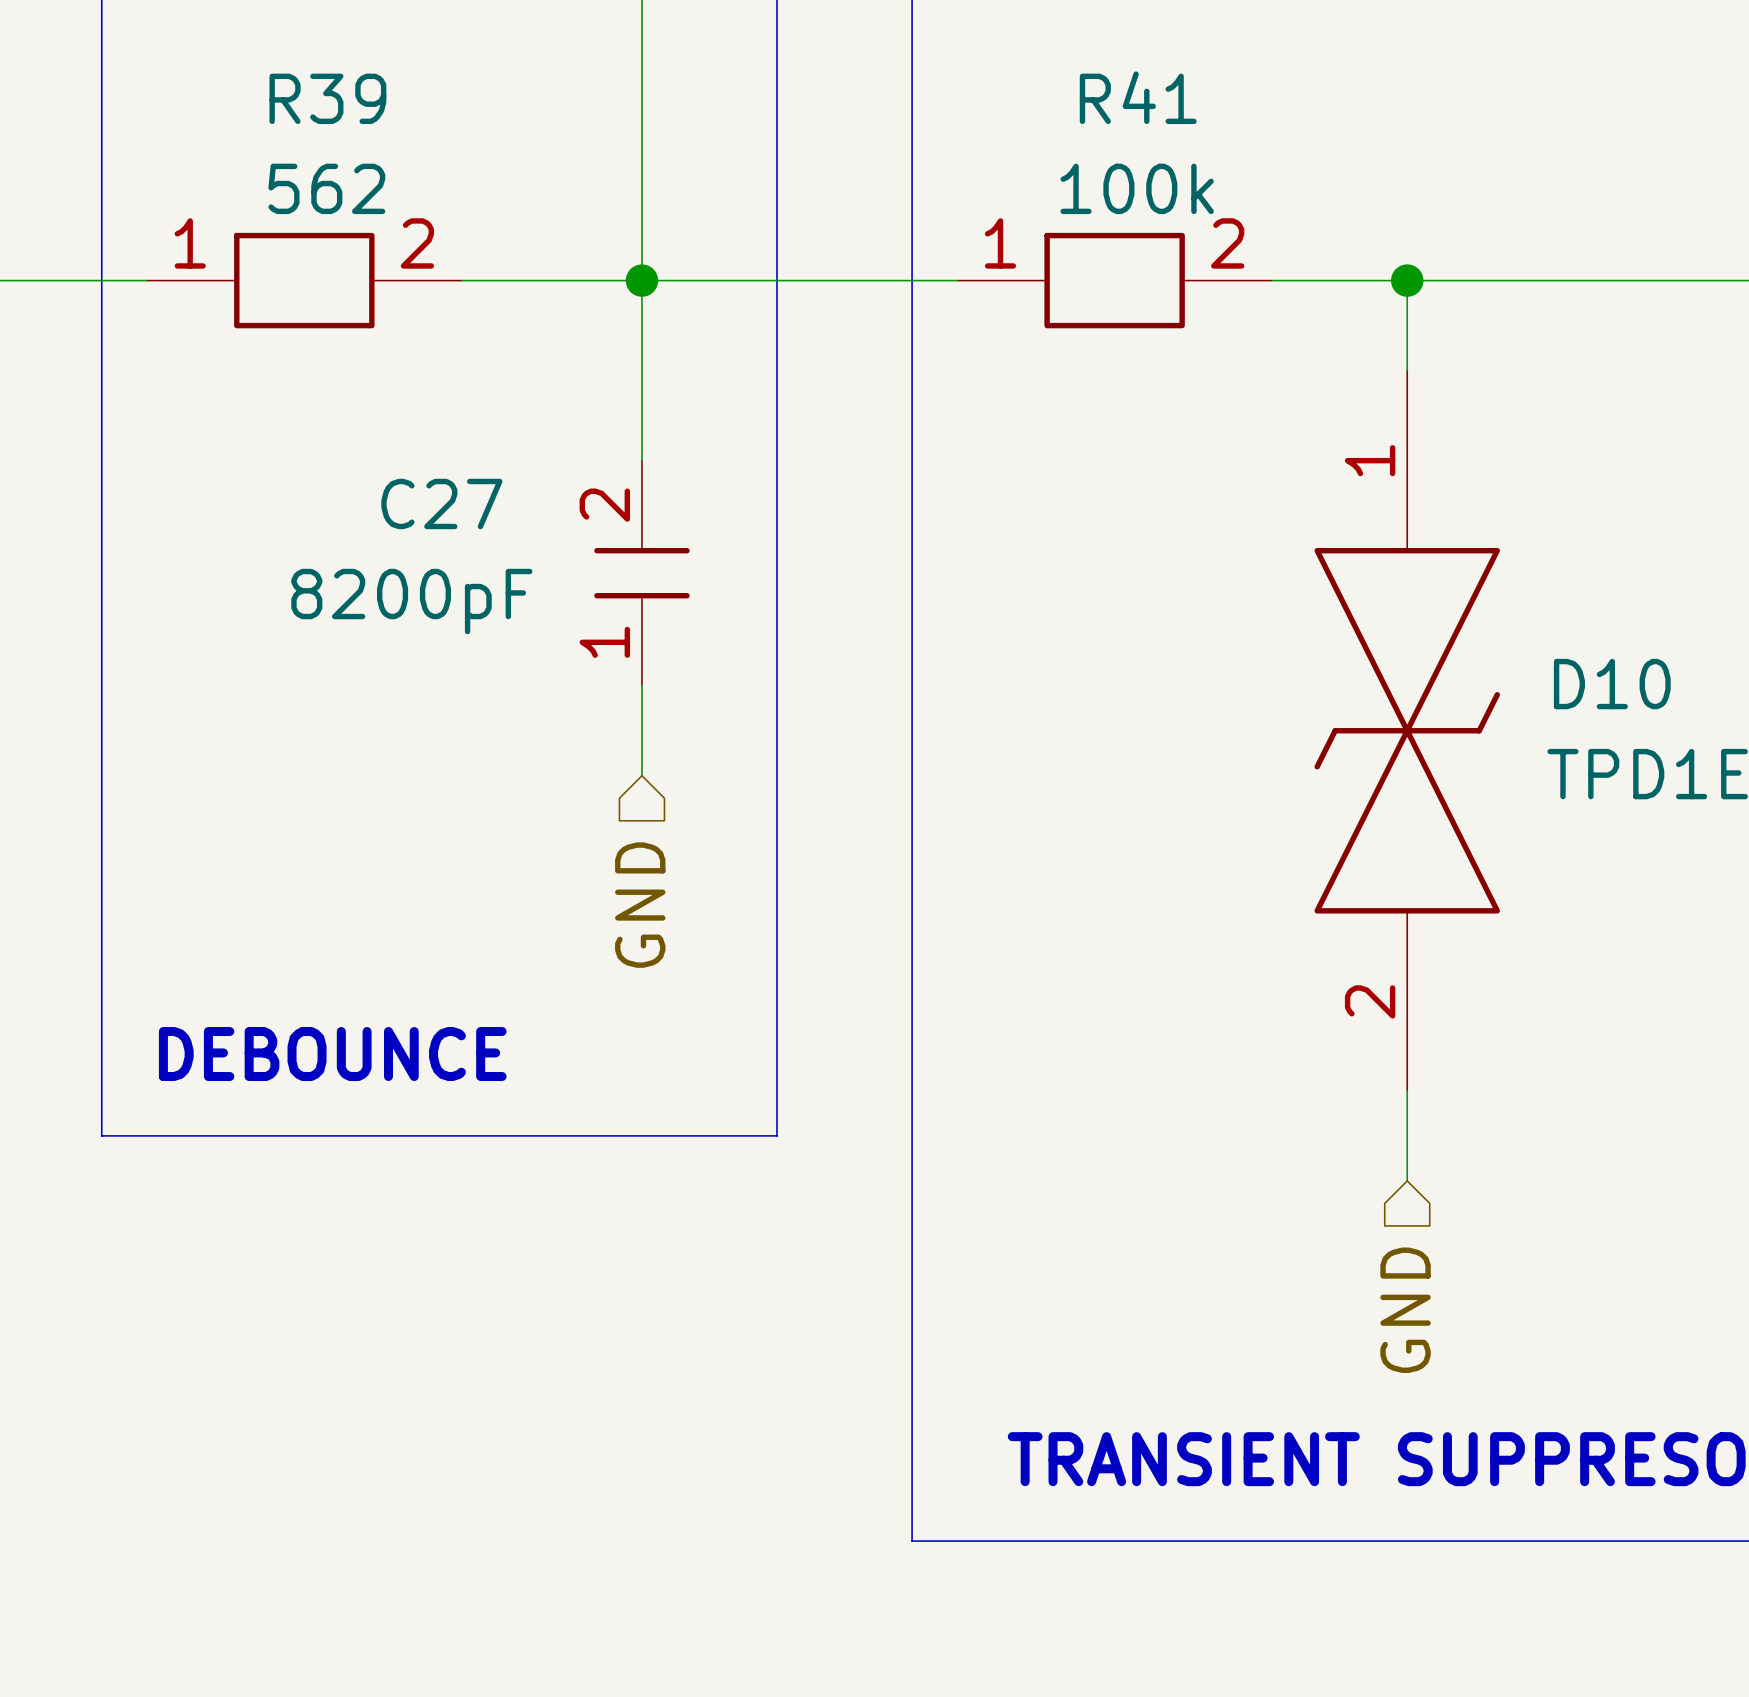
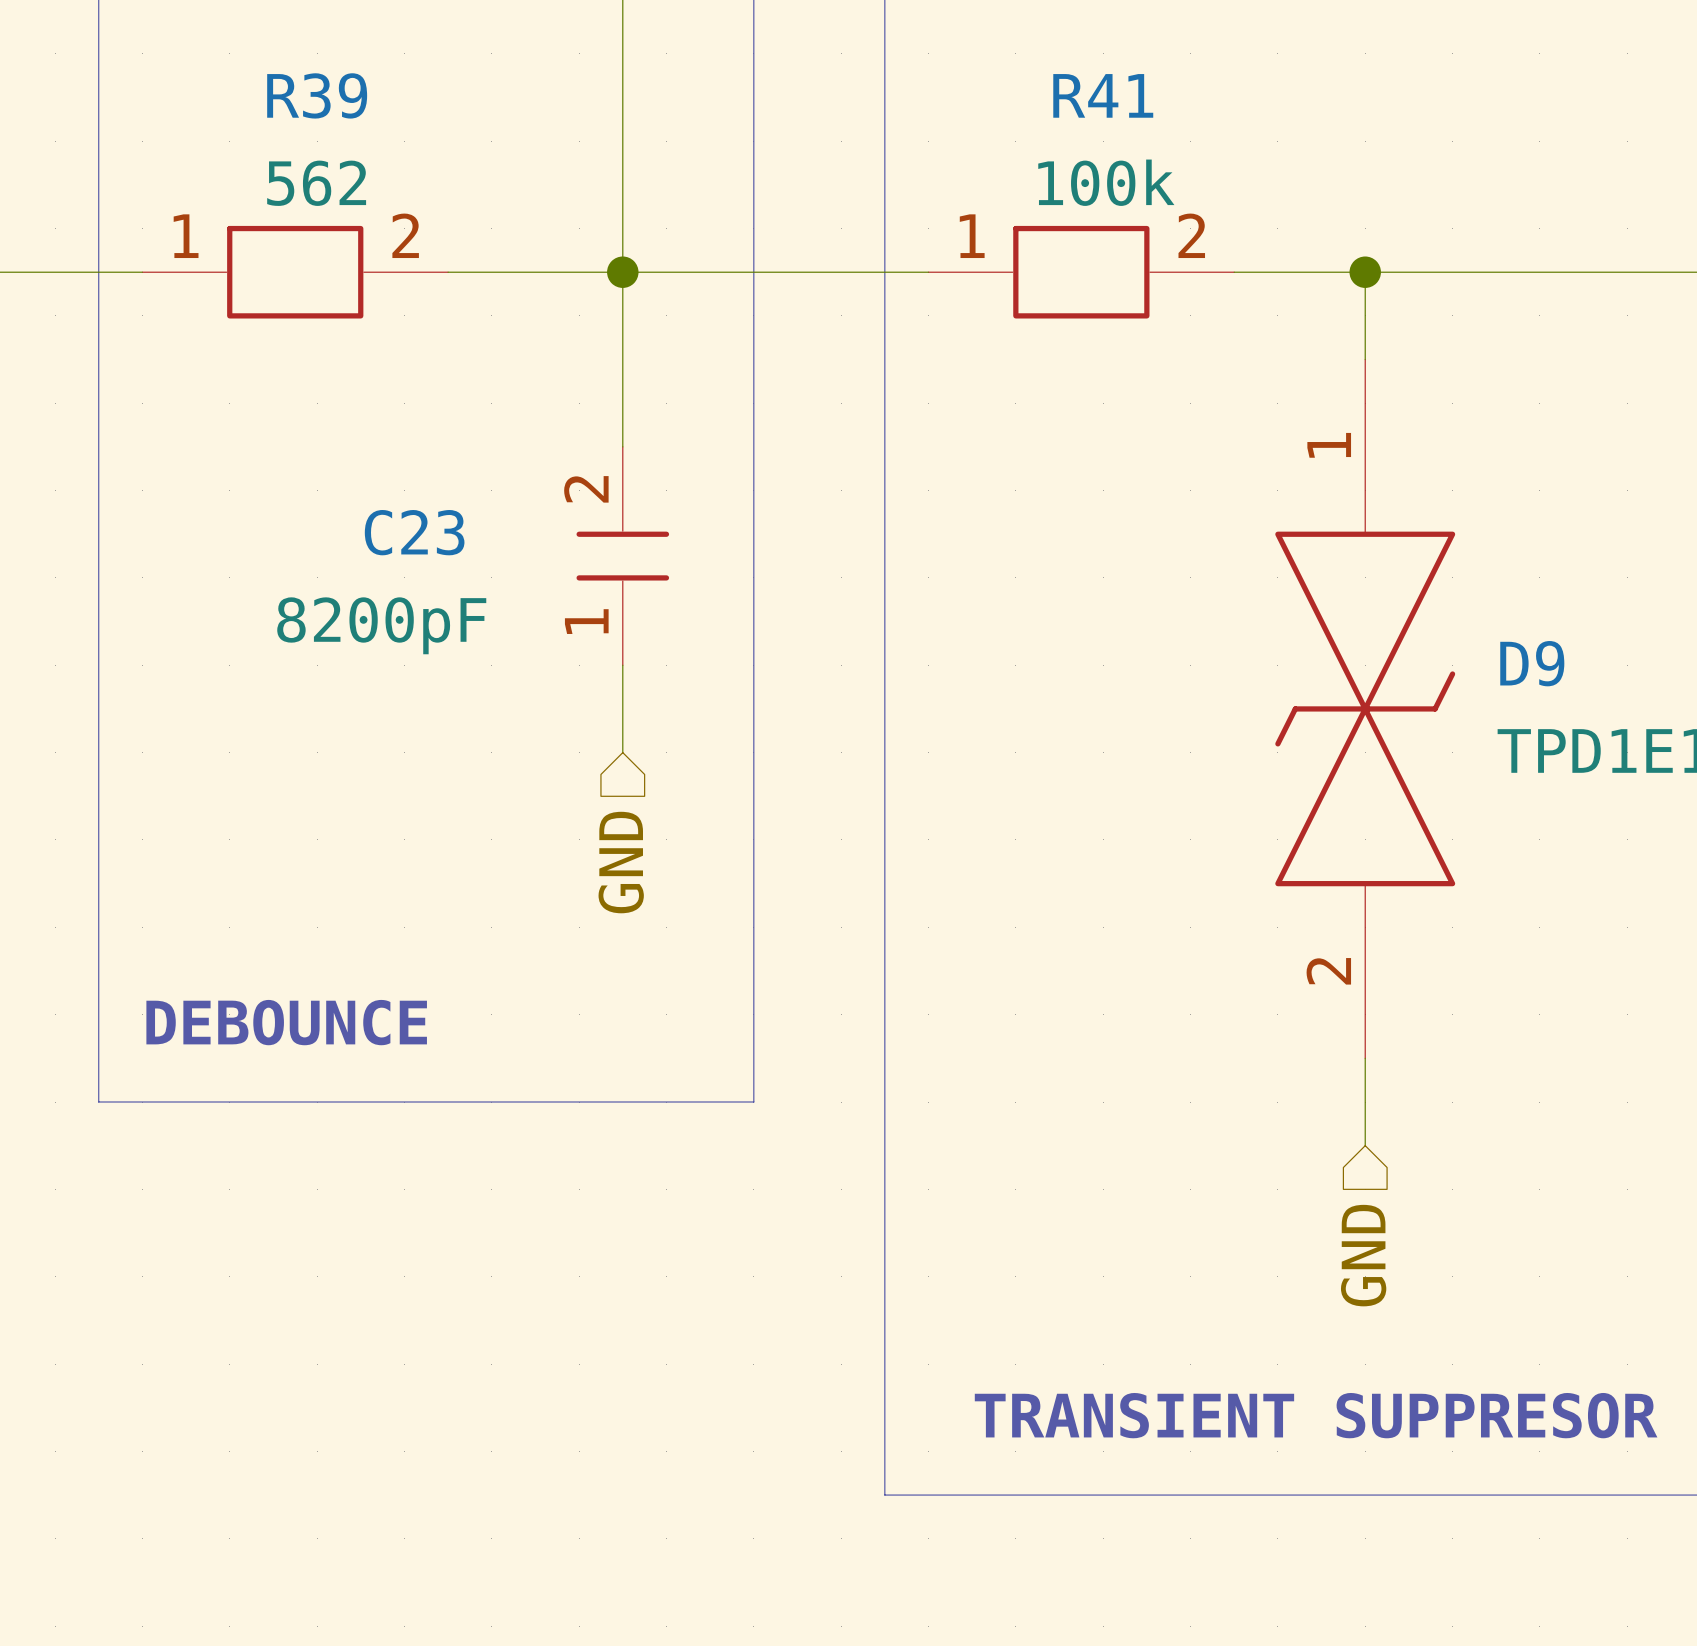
C27 name: C27 (441, 503) -> C23 (414, 532)
C27 value position: 8200pF (411, 601) -> 8200pF (381, 625)
D10 name: D10 (1612, 684) -> D9 (1532, 663)

